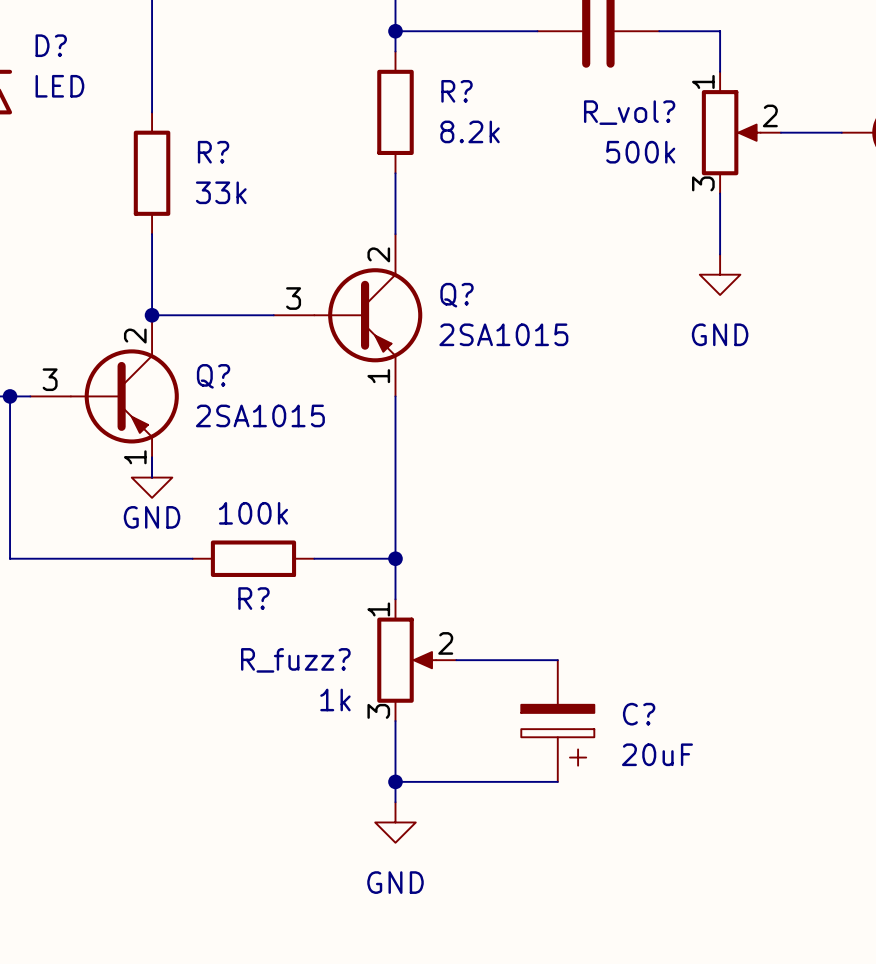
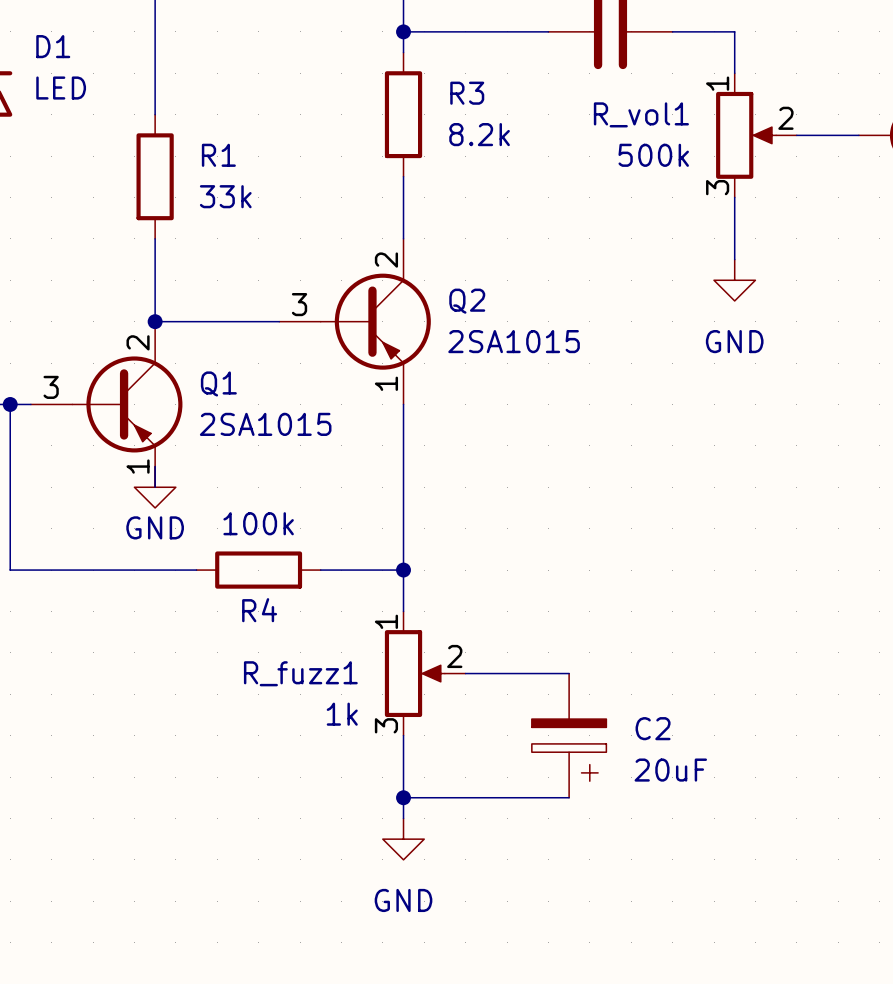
D? name: D? (51, 45) -> D1 (53, 46)
R? name: R? (456, 91) -> R3 (467, 93)
R_vol? name: R_vol? (629, 112) -> R_vol1 (641, 114)
R? name: R? (213, 152) -> R1 (218, 155)
Q? name: Q? (456, 295) -> Q2 (467, 301)
Q? name: Q? (213, 376) -> Q1 (218, 383)
R? name: R? (253, 598) -> R4 (259, 610)
R_fuzz? name: R_fuzz? (295, 660) -> R_fuzz1 (300, 673)
C? name: C? (639, 714) -> C2 (653, 728)

